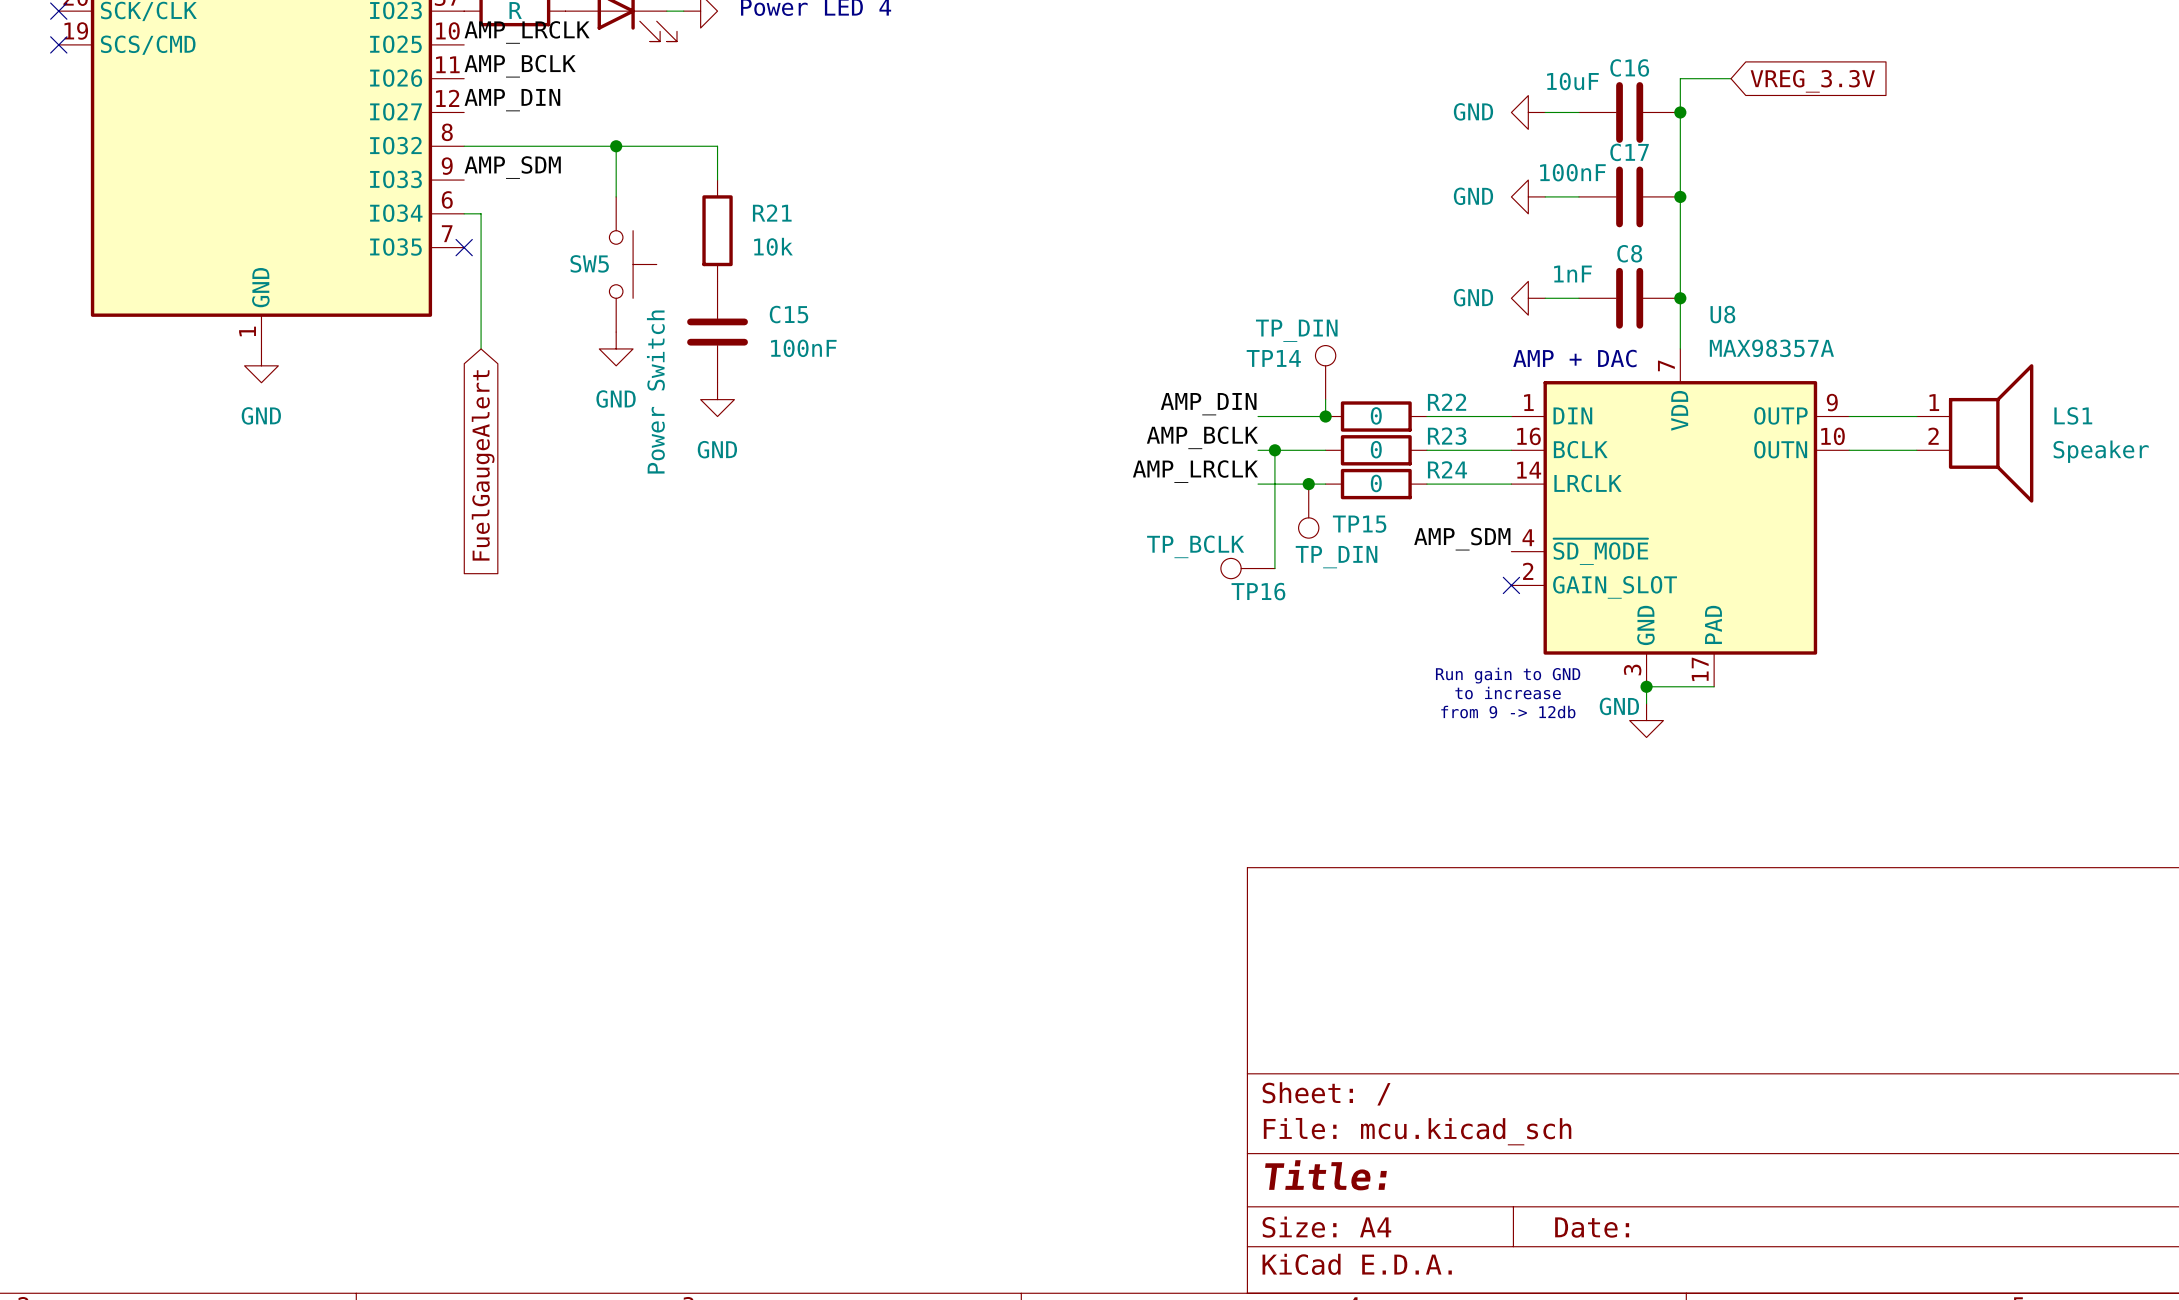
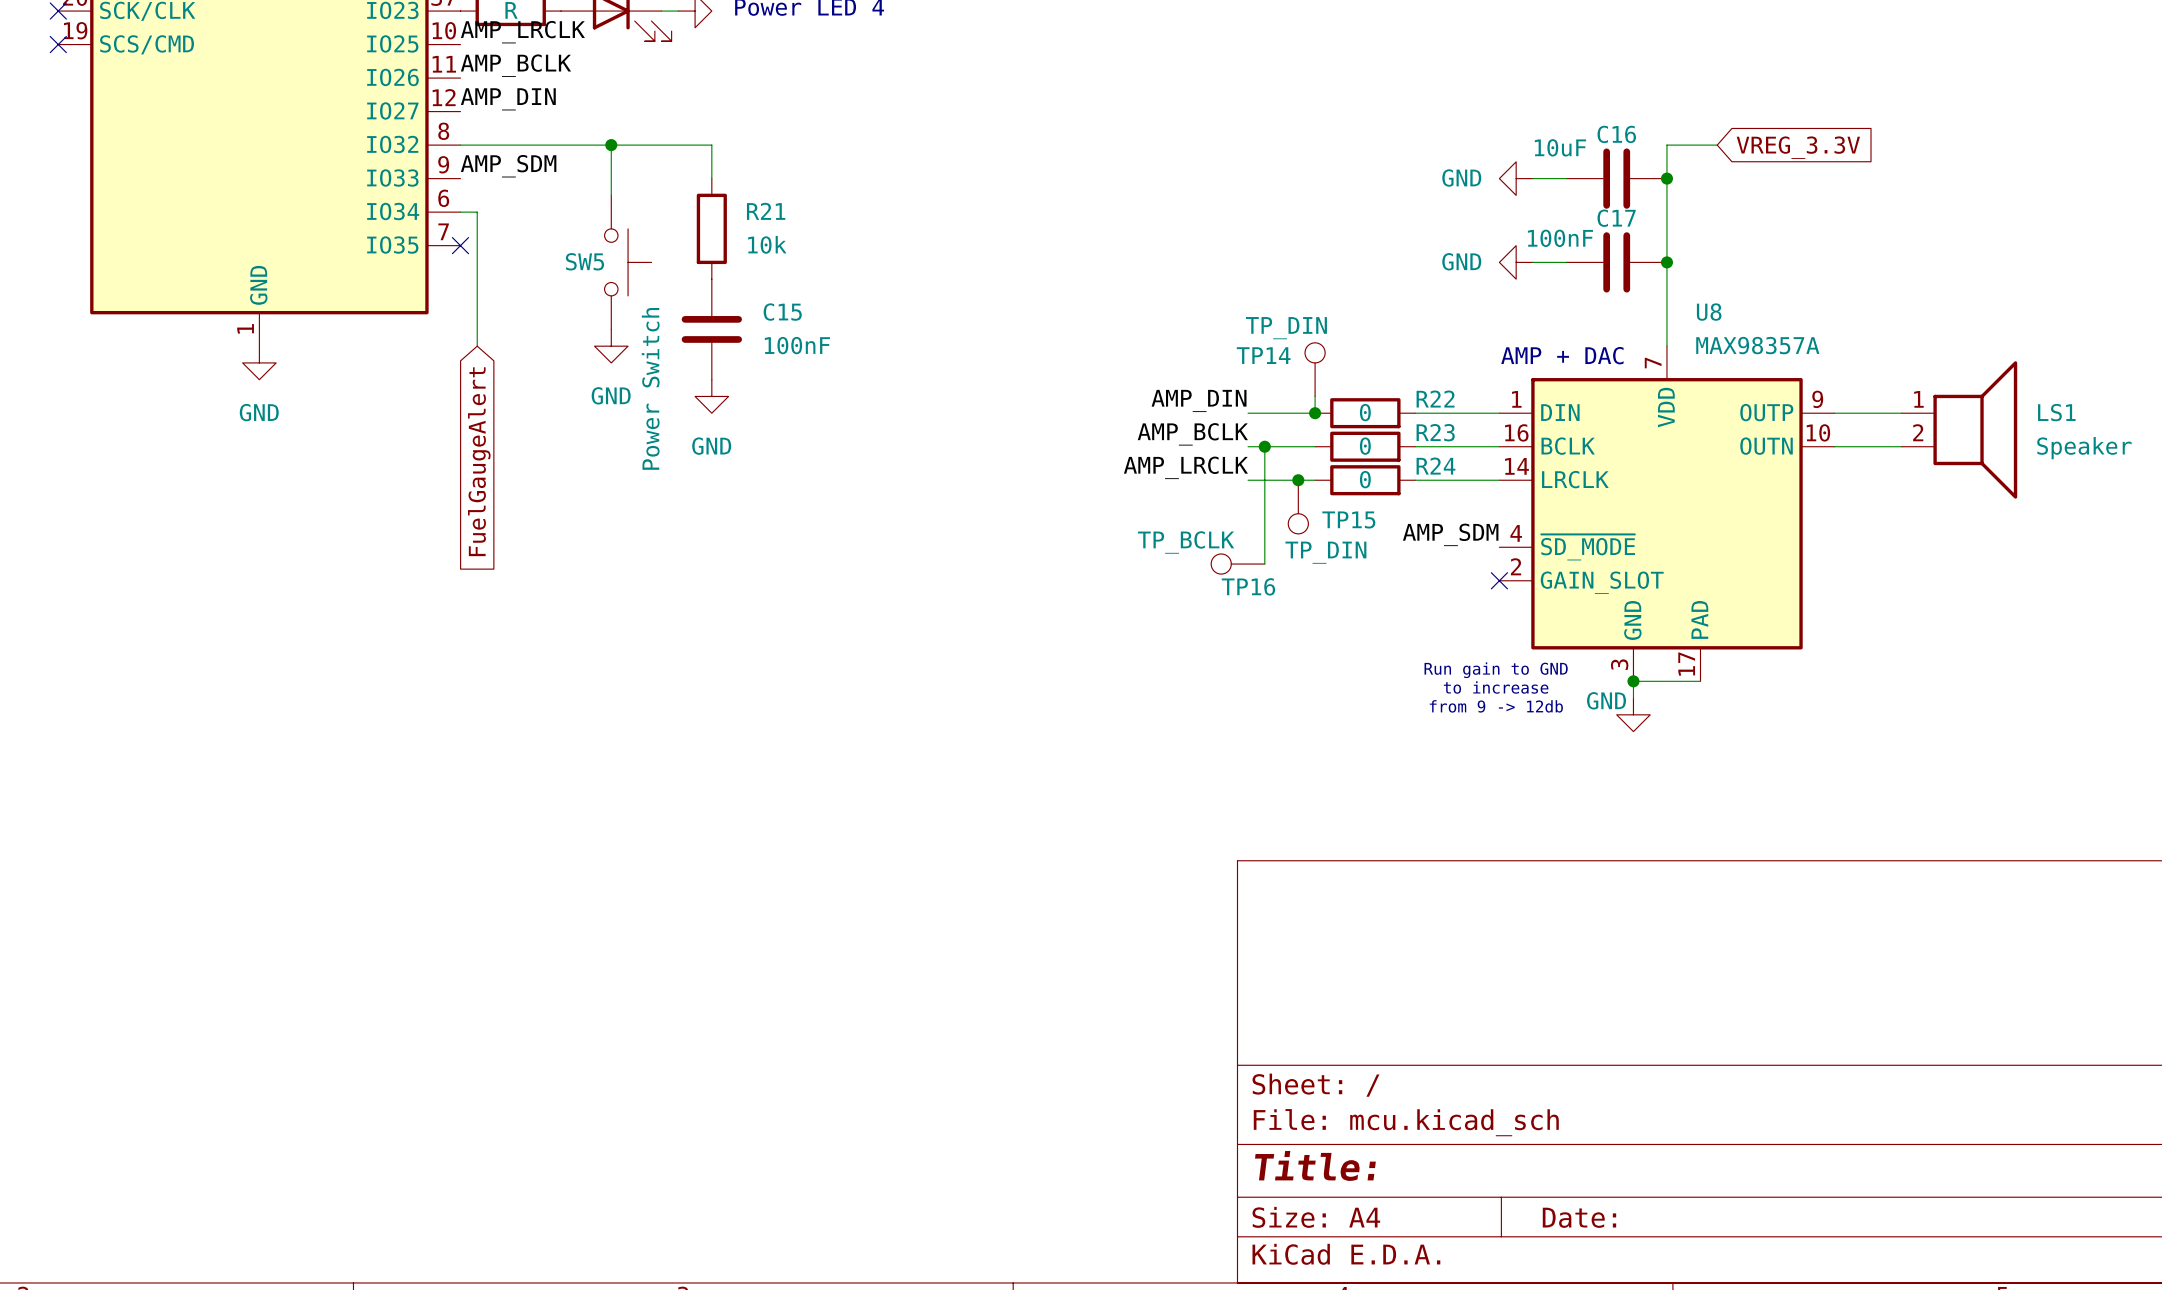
wire: (1731, 78) (1680, 78) (1680, 146) -> (1717, 145) (1666, 145)
global label position: VREG_3.3V (1812, 81) -> VREG_3.3V (1798, 147)
power symbol: GND (1528, 112) -> none
wire: (1545, 112) (1578, 112) -> (1532, 178) (1566, 178)
C16 position: (1629, 112) -> (1616, 178)
junction: (1680, 112) -> none
power symbol position: GND (1528, 196) -> GND (1516, 178)
wire: (1545, 196) (1578, 196) -> (1532, 262) (1566, 262)
C17 position: (1629, 196) -> (1616, 262)
junction position: (1680, 196) -> (1666, 178)
power symbol: none -> GND (1516, 262)
junction: none -> (1666, 262)
power symbol: GND (1528, 298) -> none
wire: (1545, 298) (1578, 298) -> none
C8: 1nF (1629, 298) -> none
junction: (1680, 298) -> none

